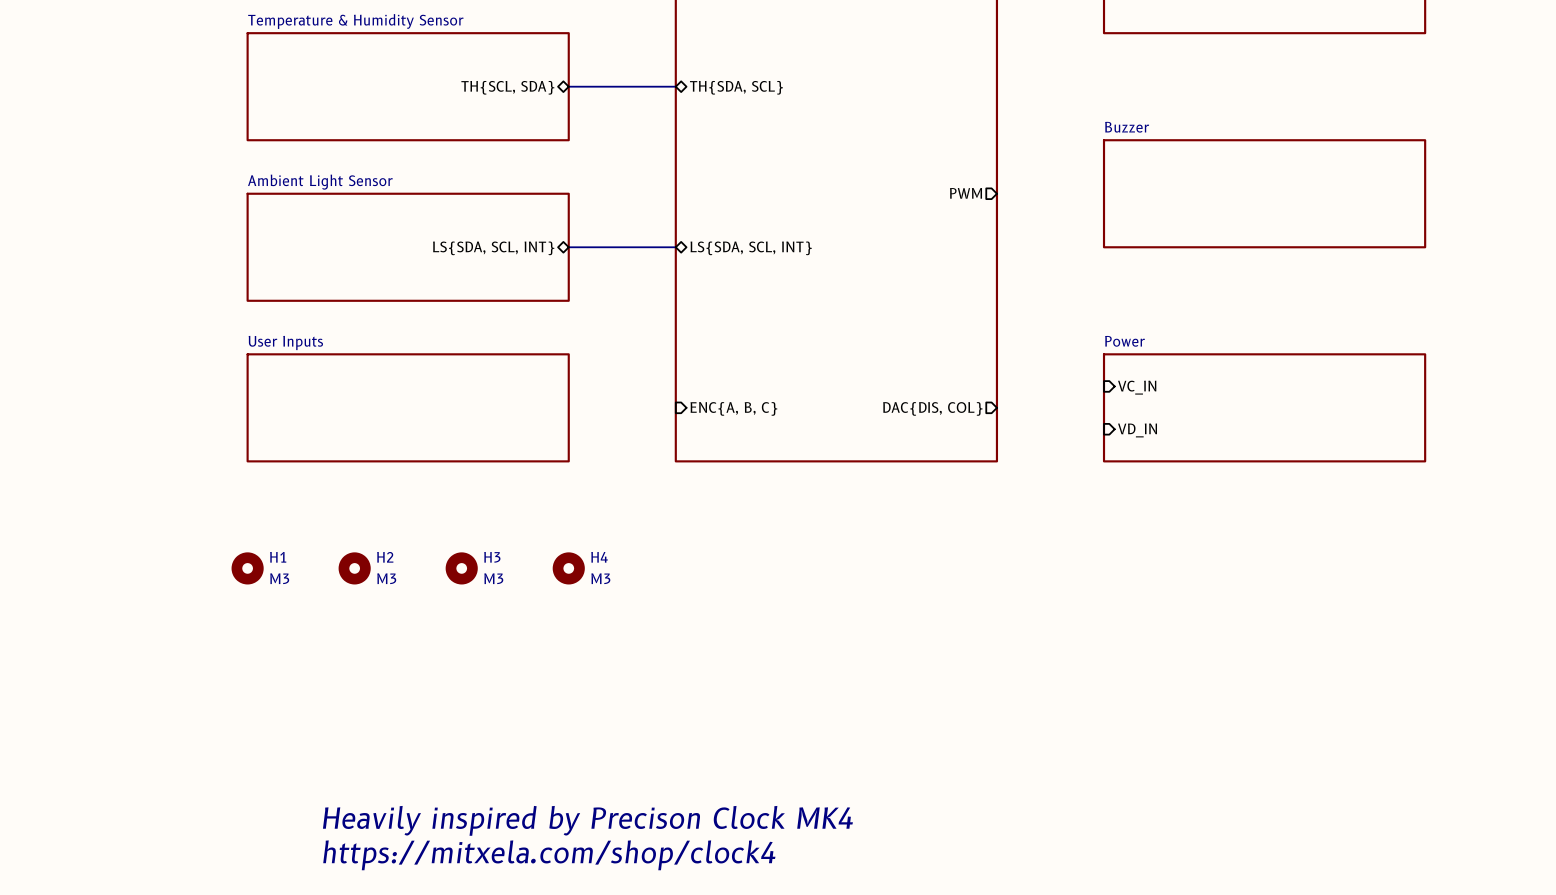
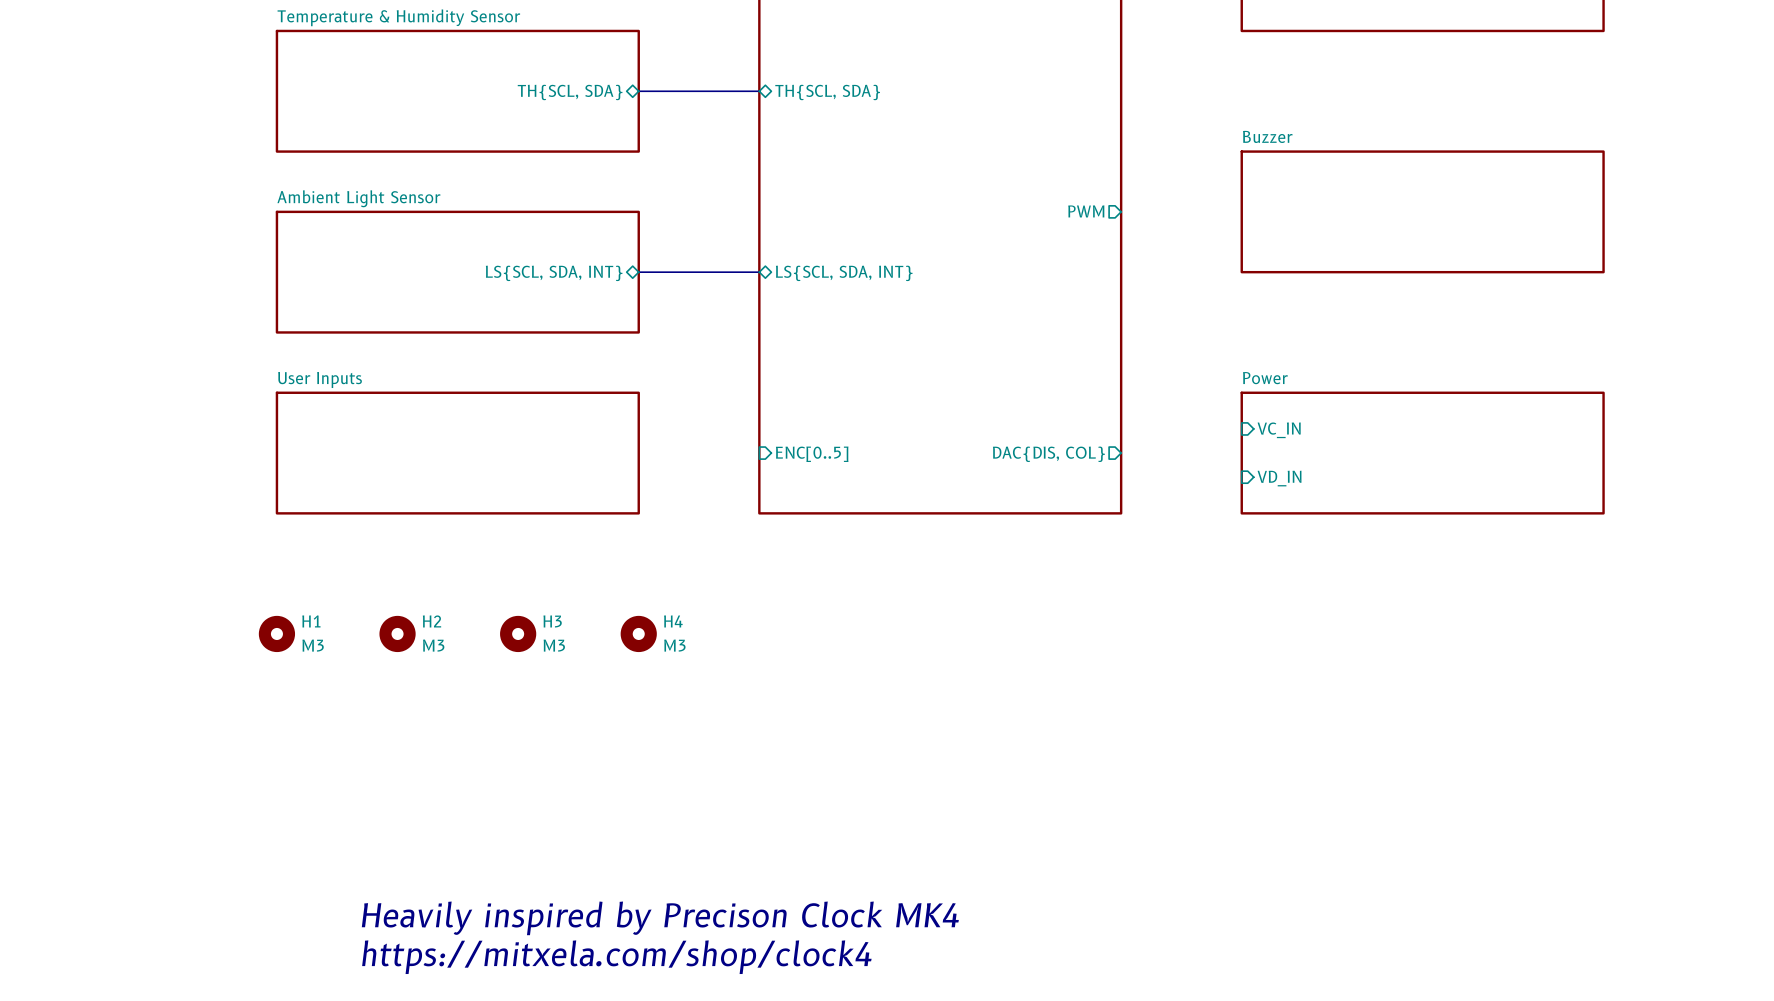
sheet pin: TH{SDA, SCL} (736, 87) -> TH{SCL, SDA} (827, 92)
sheet pin: LS{SDA, SCL, INT} (493, 248) -> LS{SCL, SDA, INT} (554, 273)
sheet pin: LS{SDA, SCL, INT} (751, 248) -> LS{SCL, SDA, INT} (844, 273)
sheet pin: ENC{A, B, C} (733, 408) -> ENC[0..5] (812, 454)

